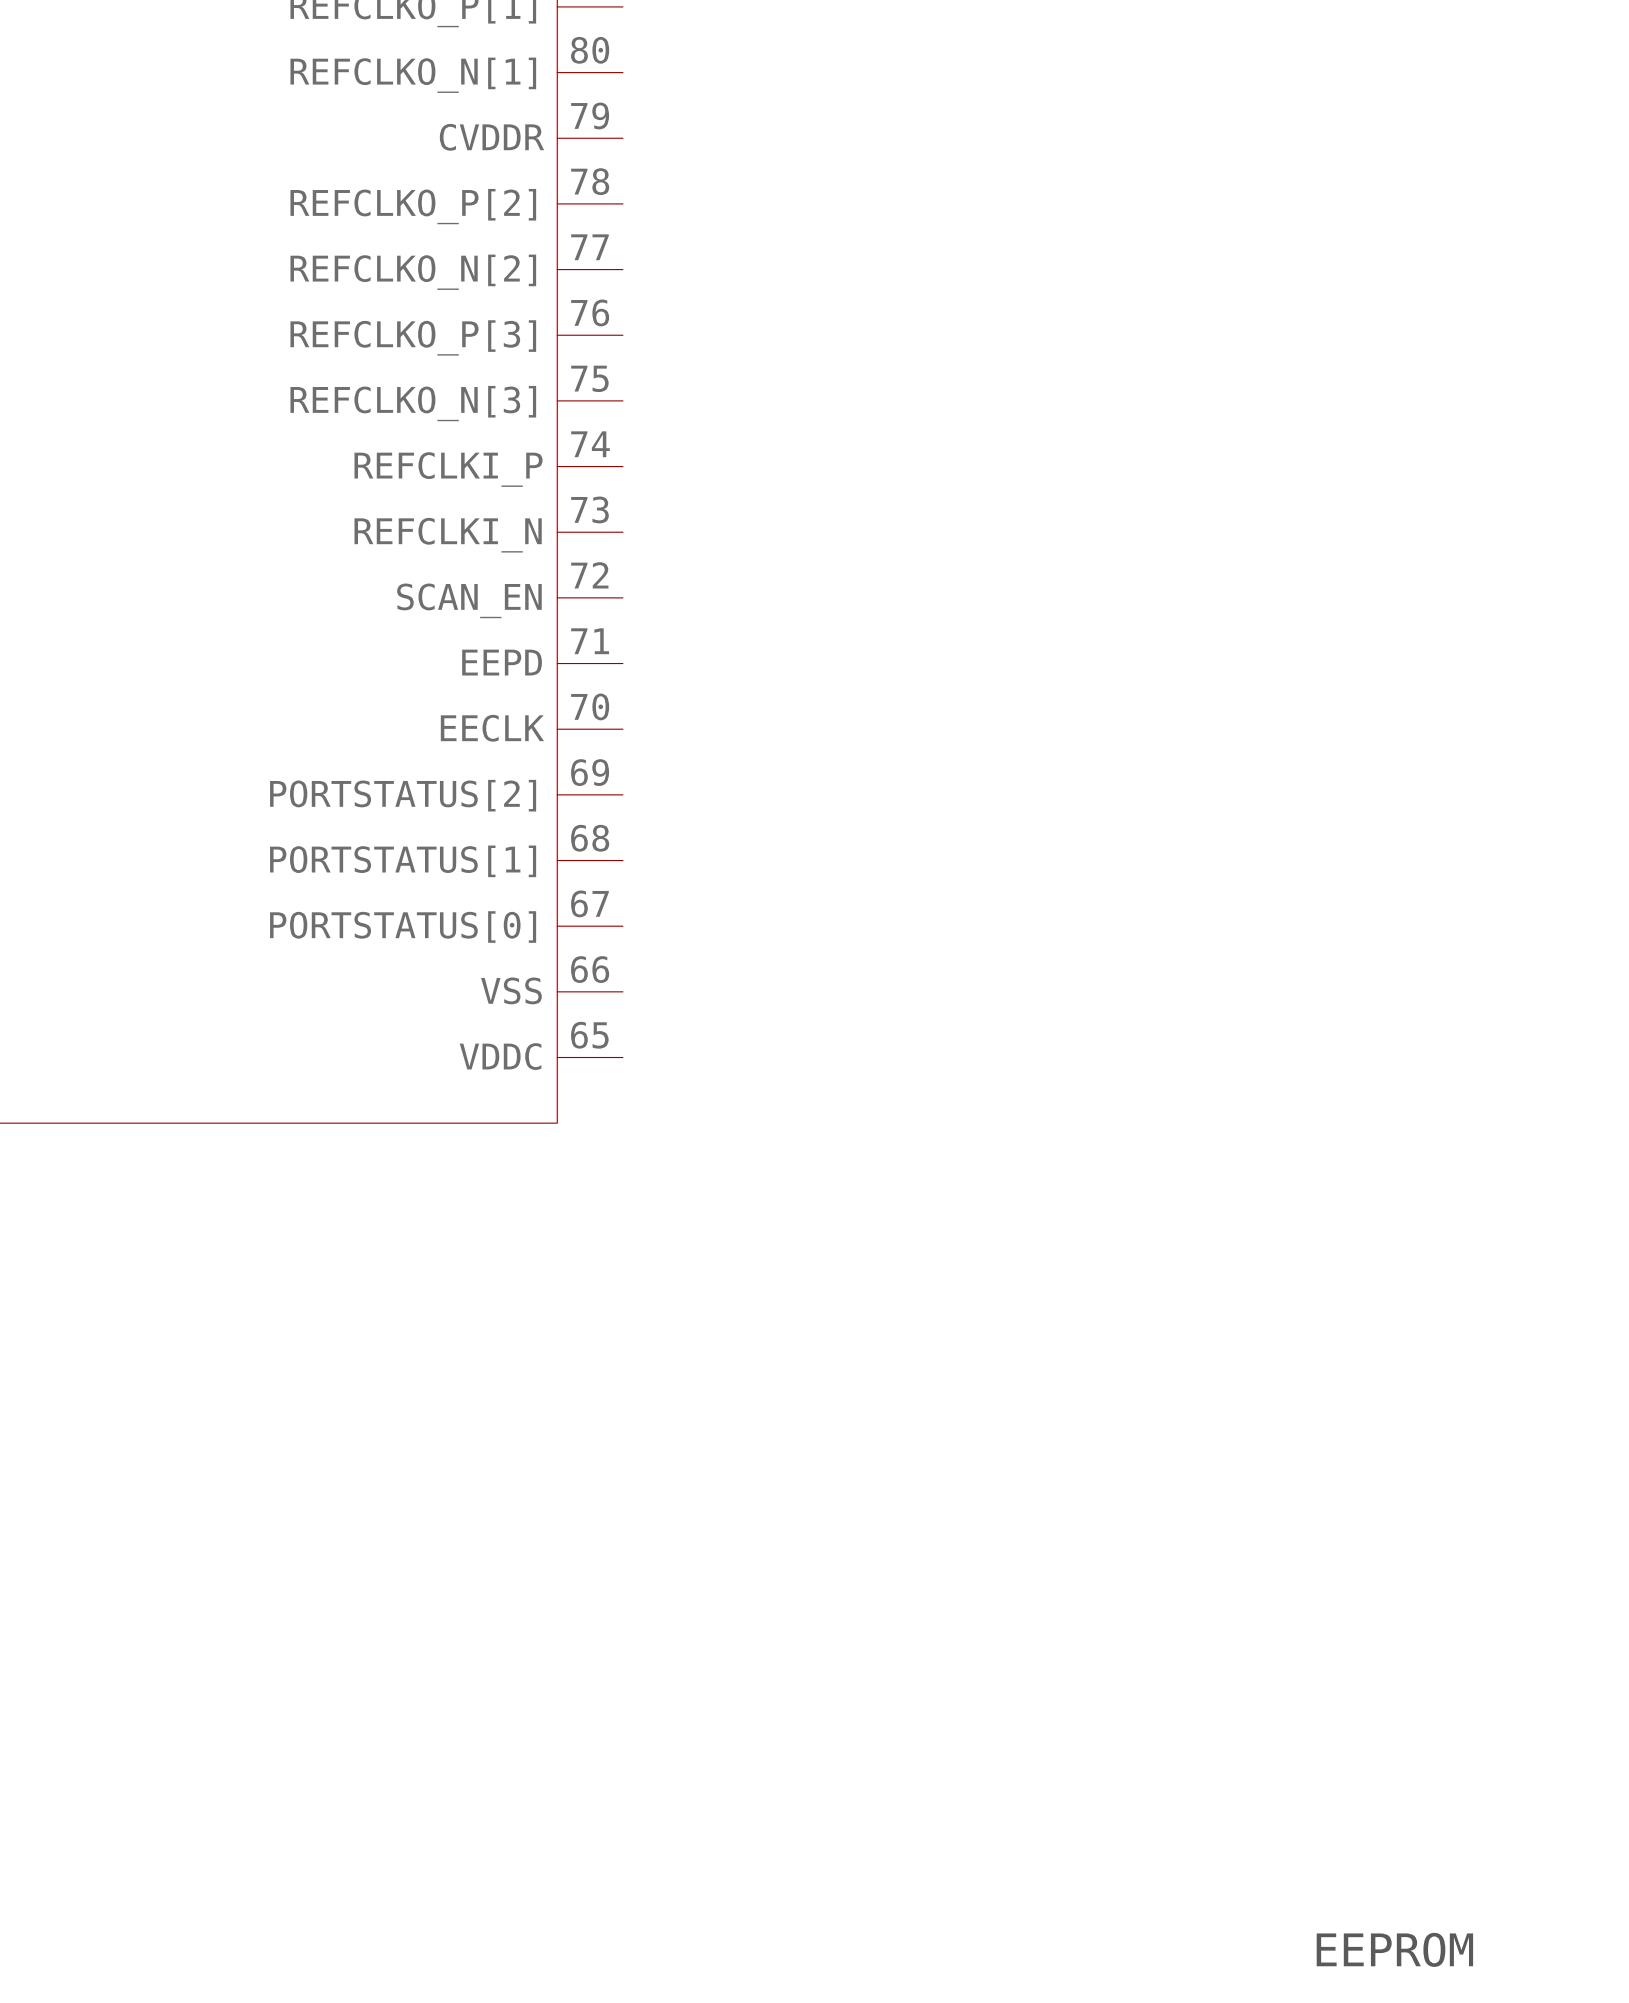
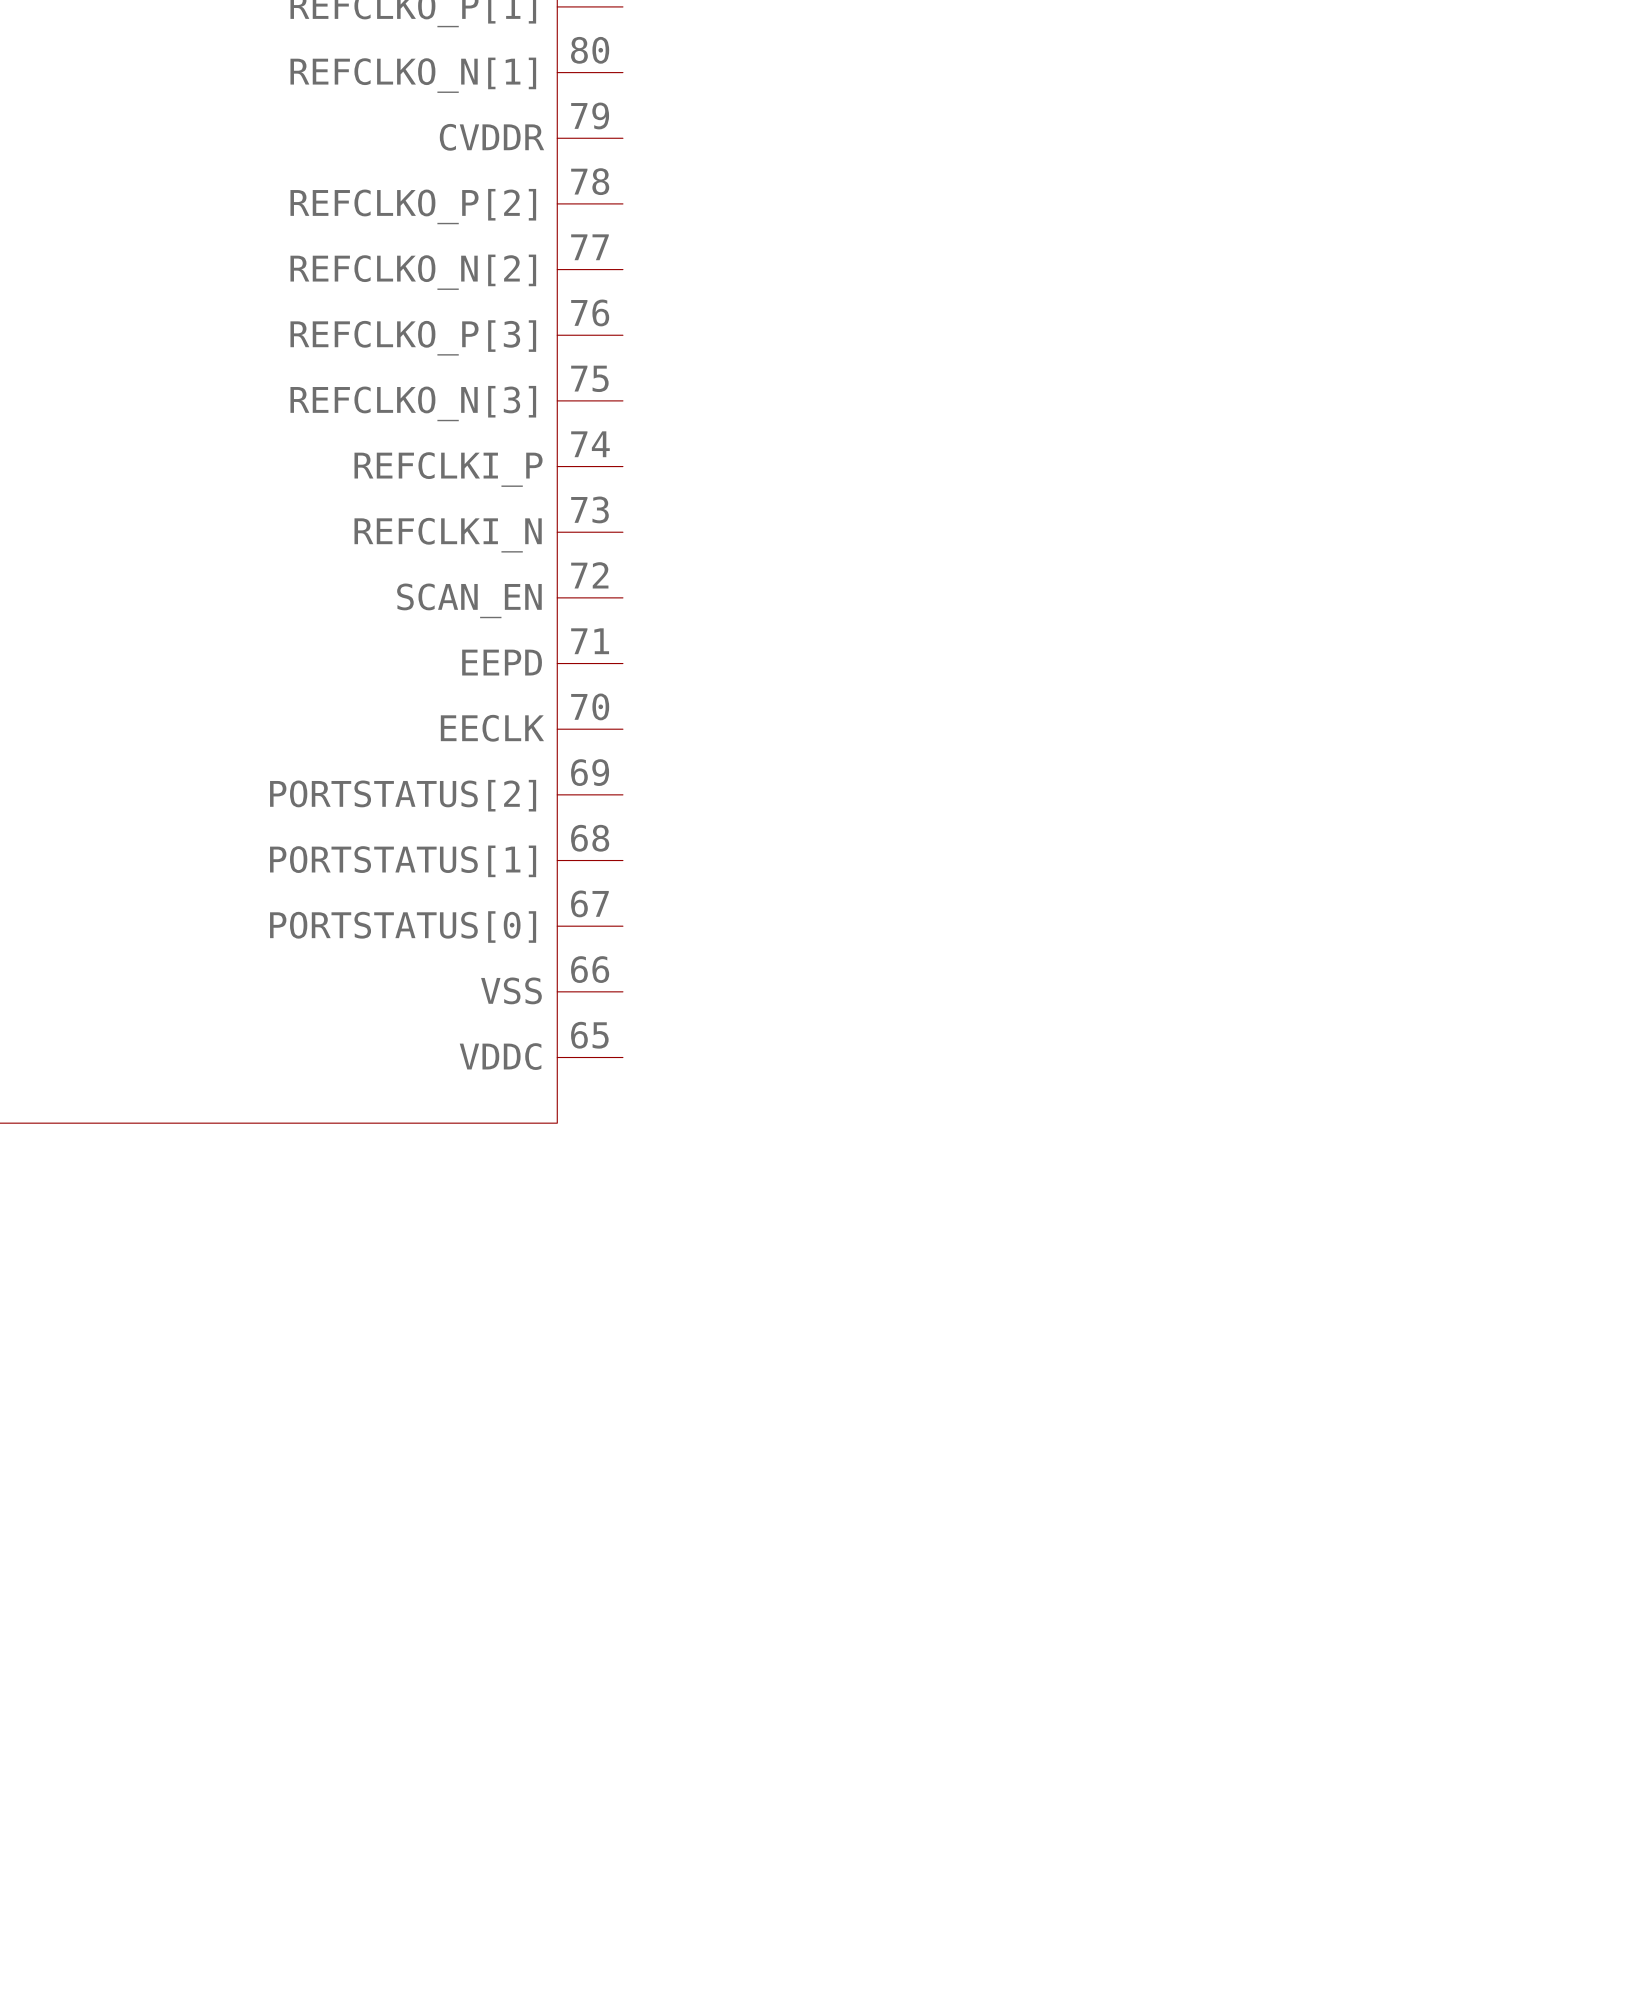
text: EEPROM (1394, 1949) -> none

